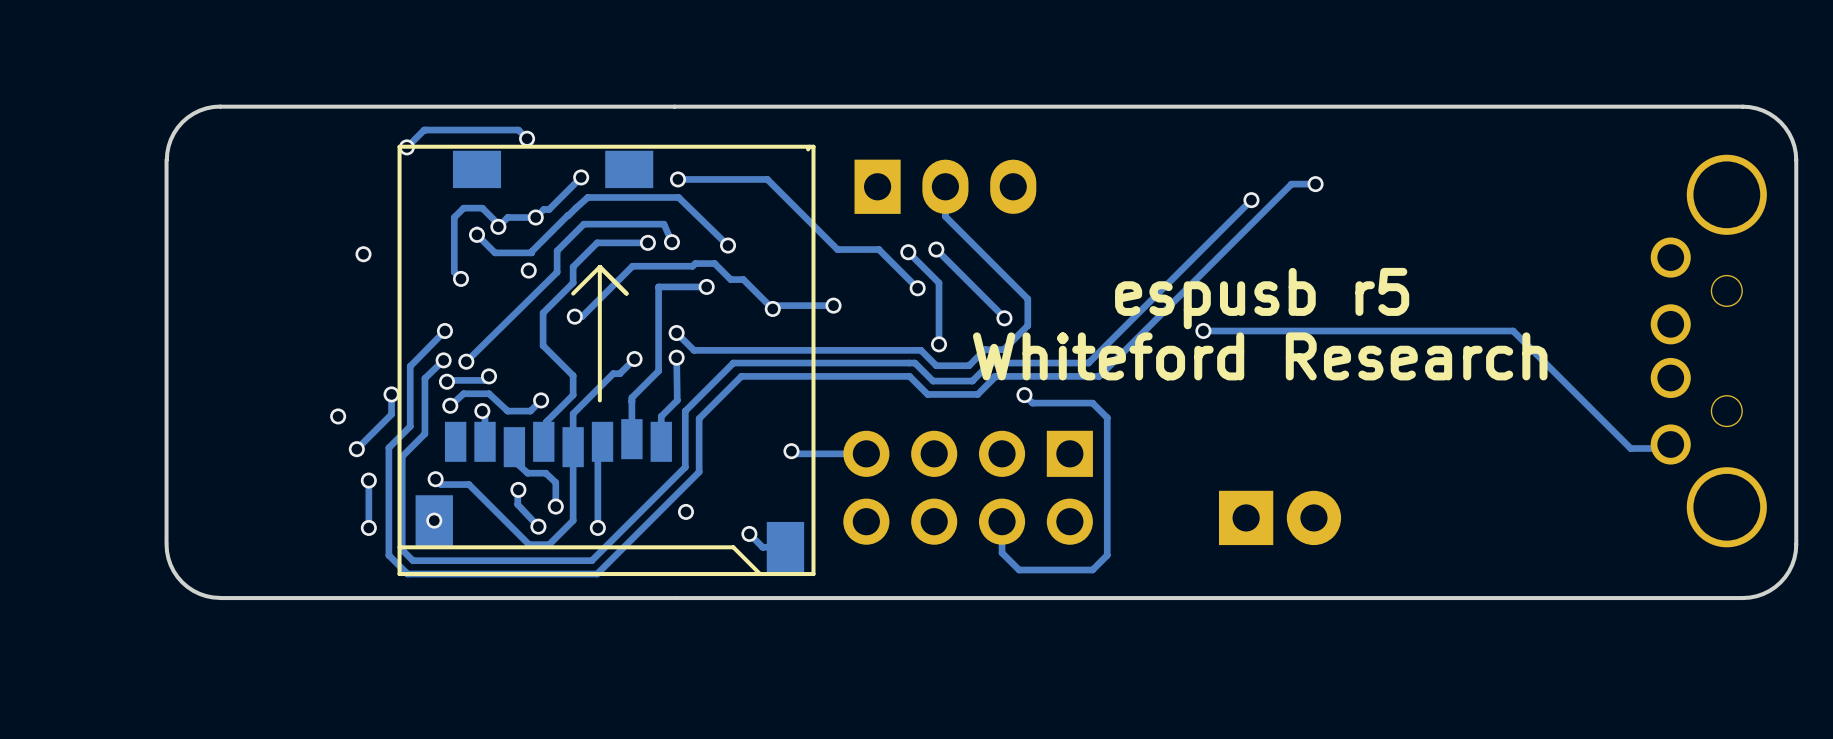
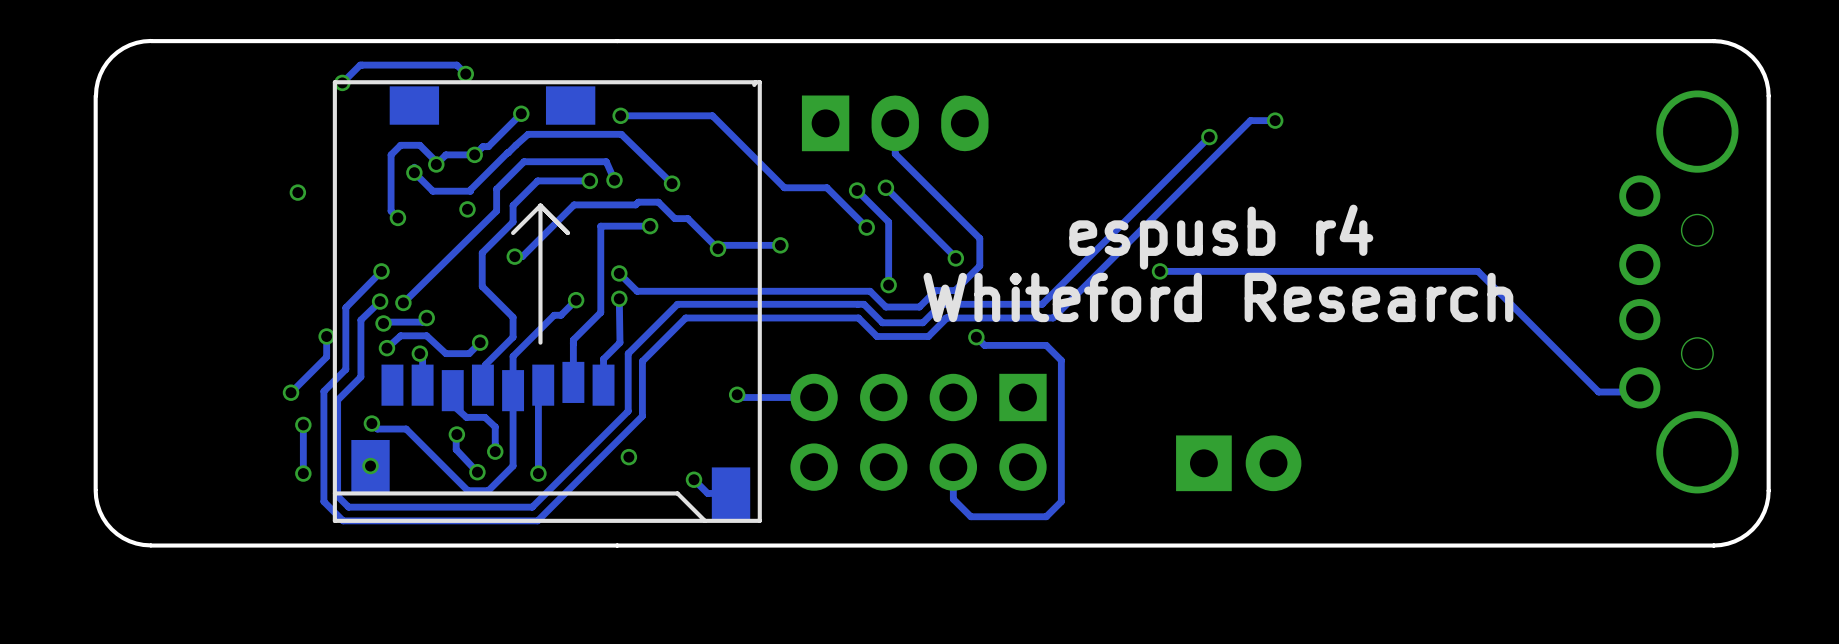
text: espusb r5 (1262, 298) -> espusb r4 (1221, 237)
via: (338, 416) -> none

